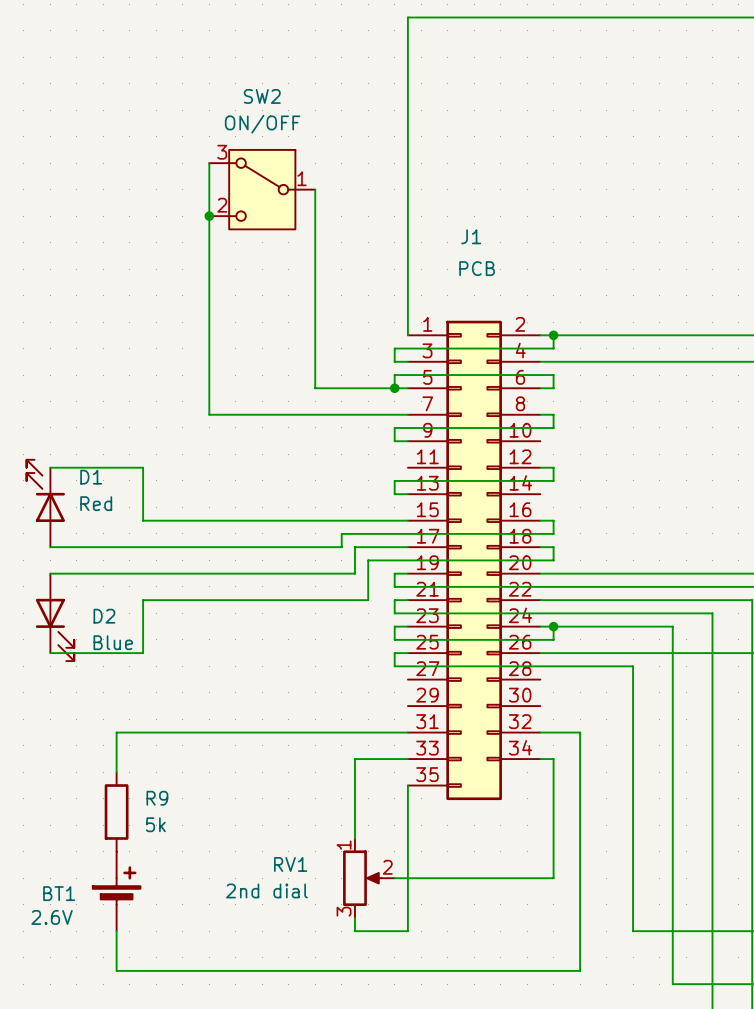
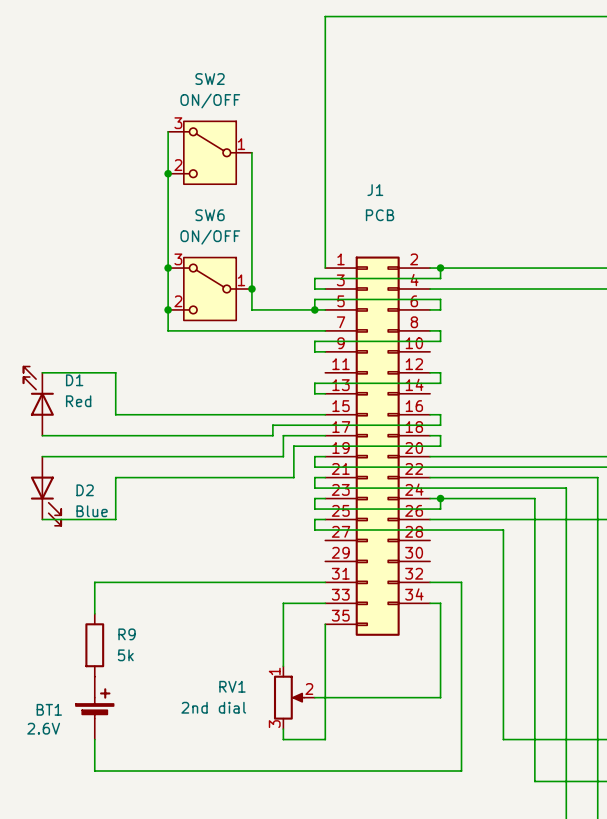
junction: none -> (168, 268)
SW6: none -> ON/OFF (210, 288)
junction: none -> (251, 288)
junction: none -> (168, 309)

